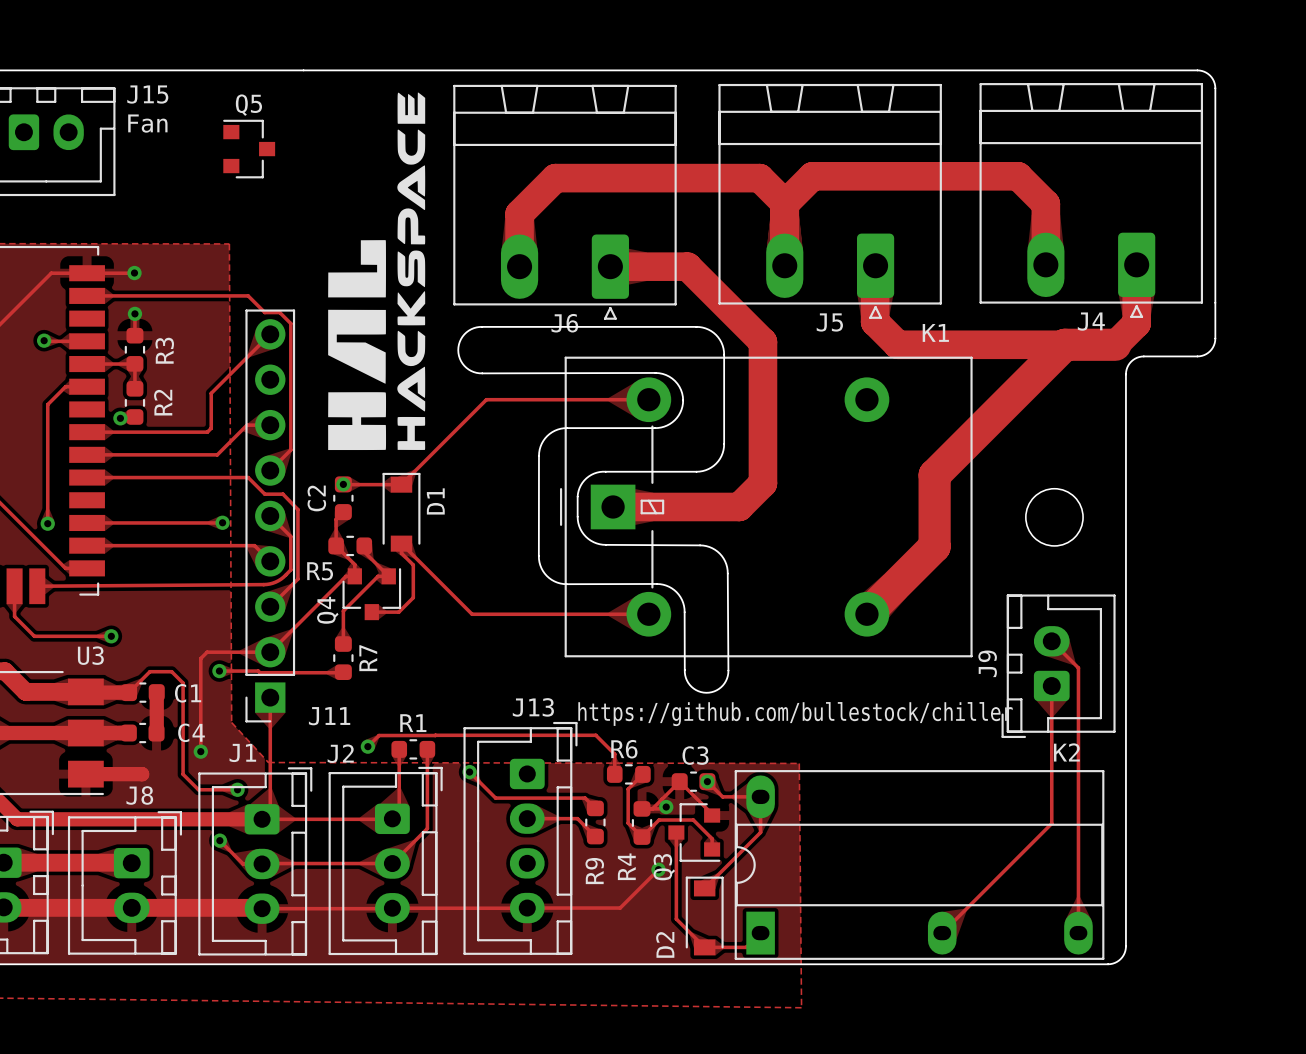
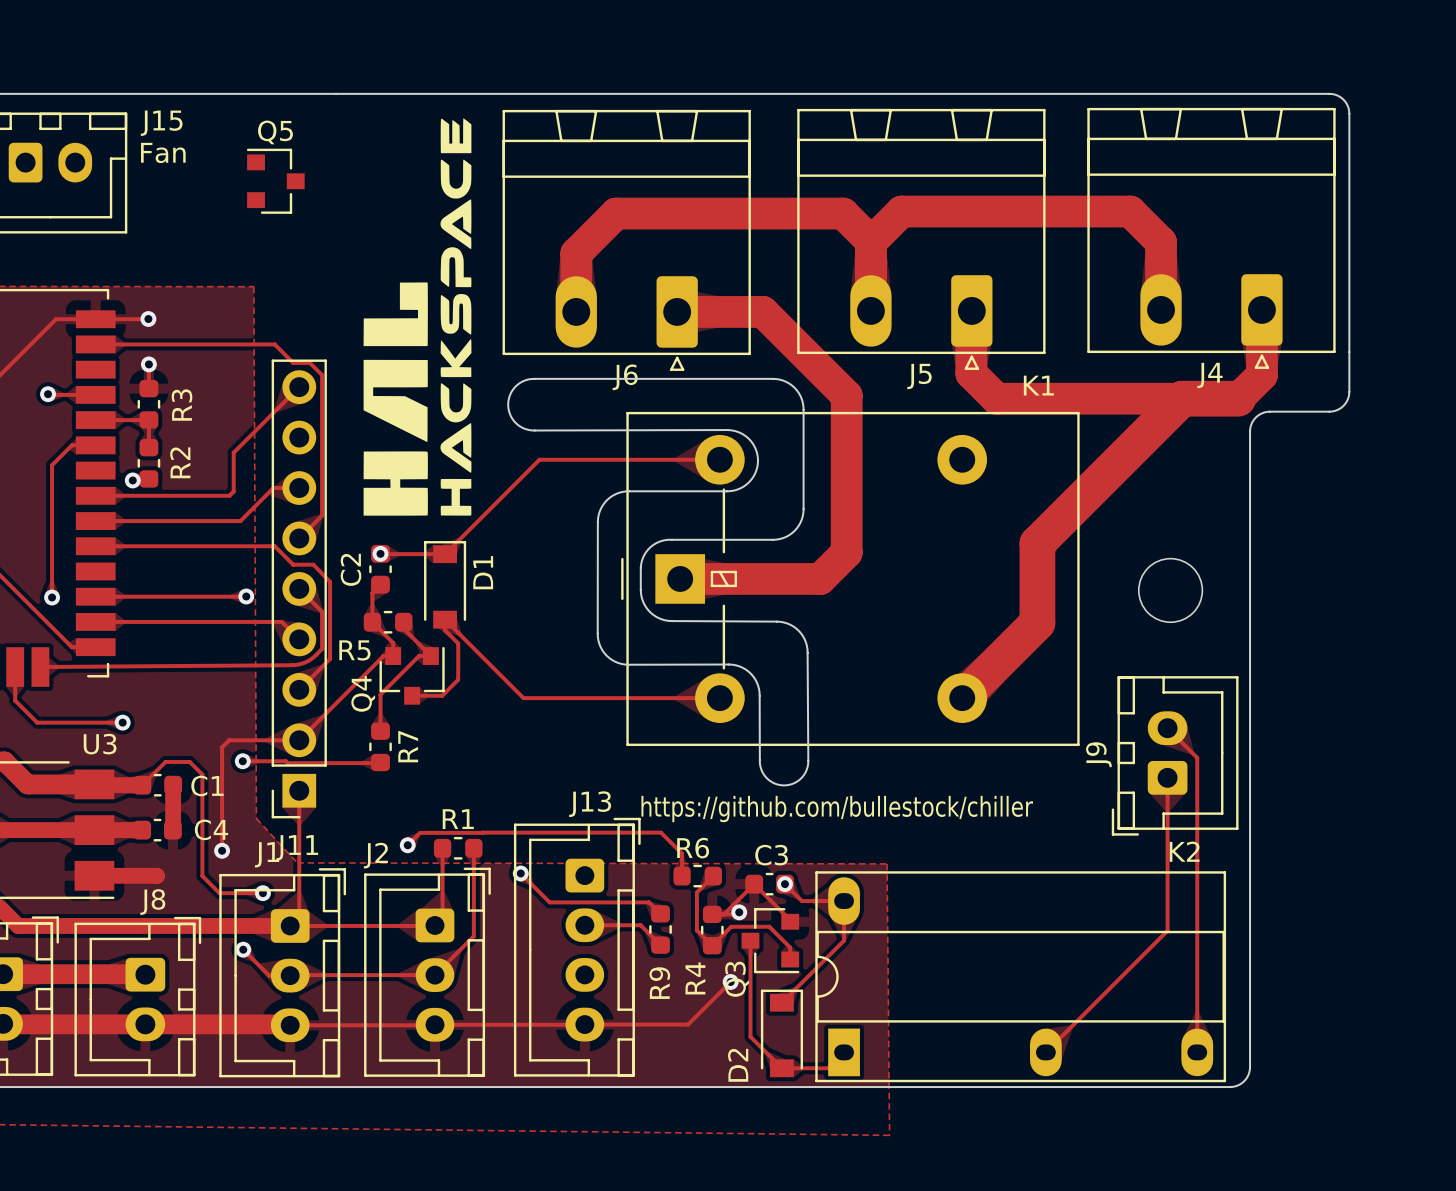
J11 name position: J11 (329, 716) -> J11 (297, 847)

